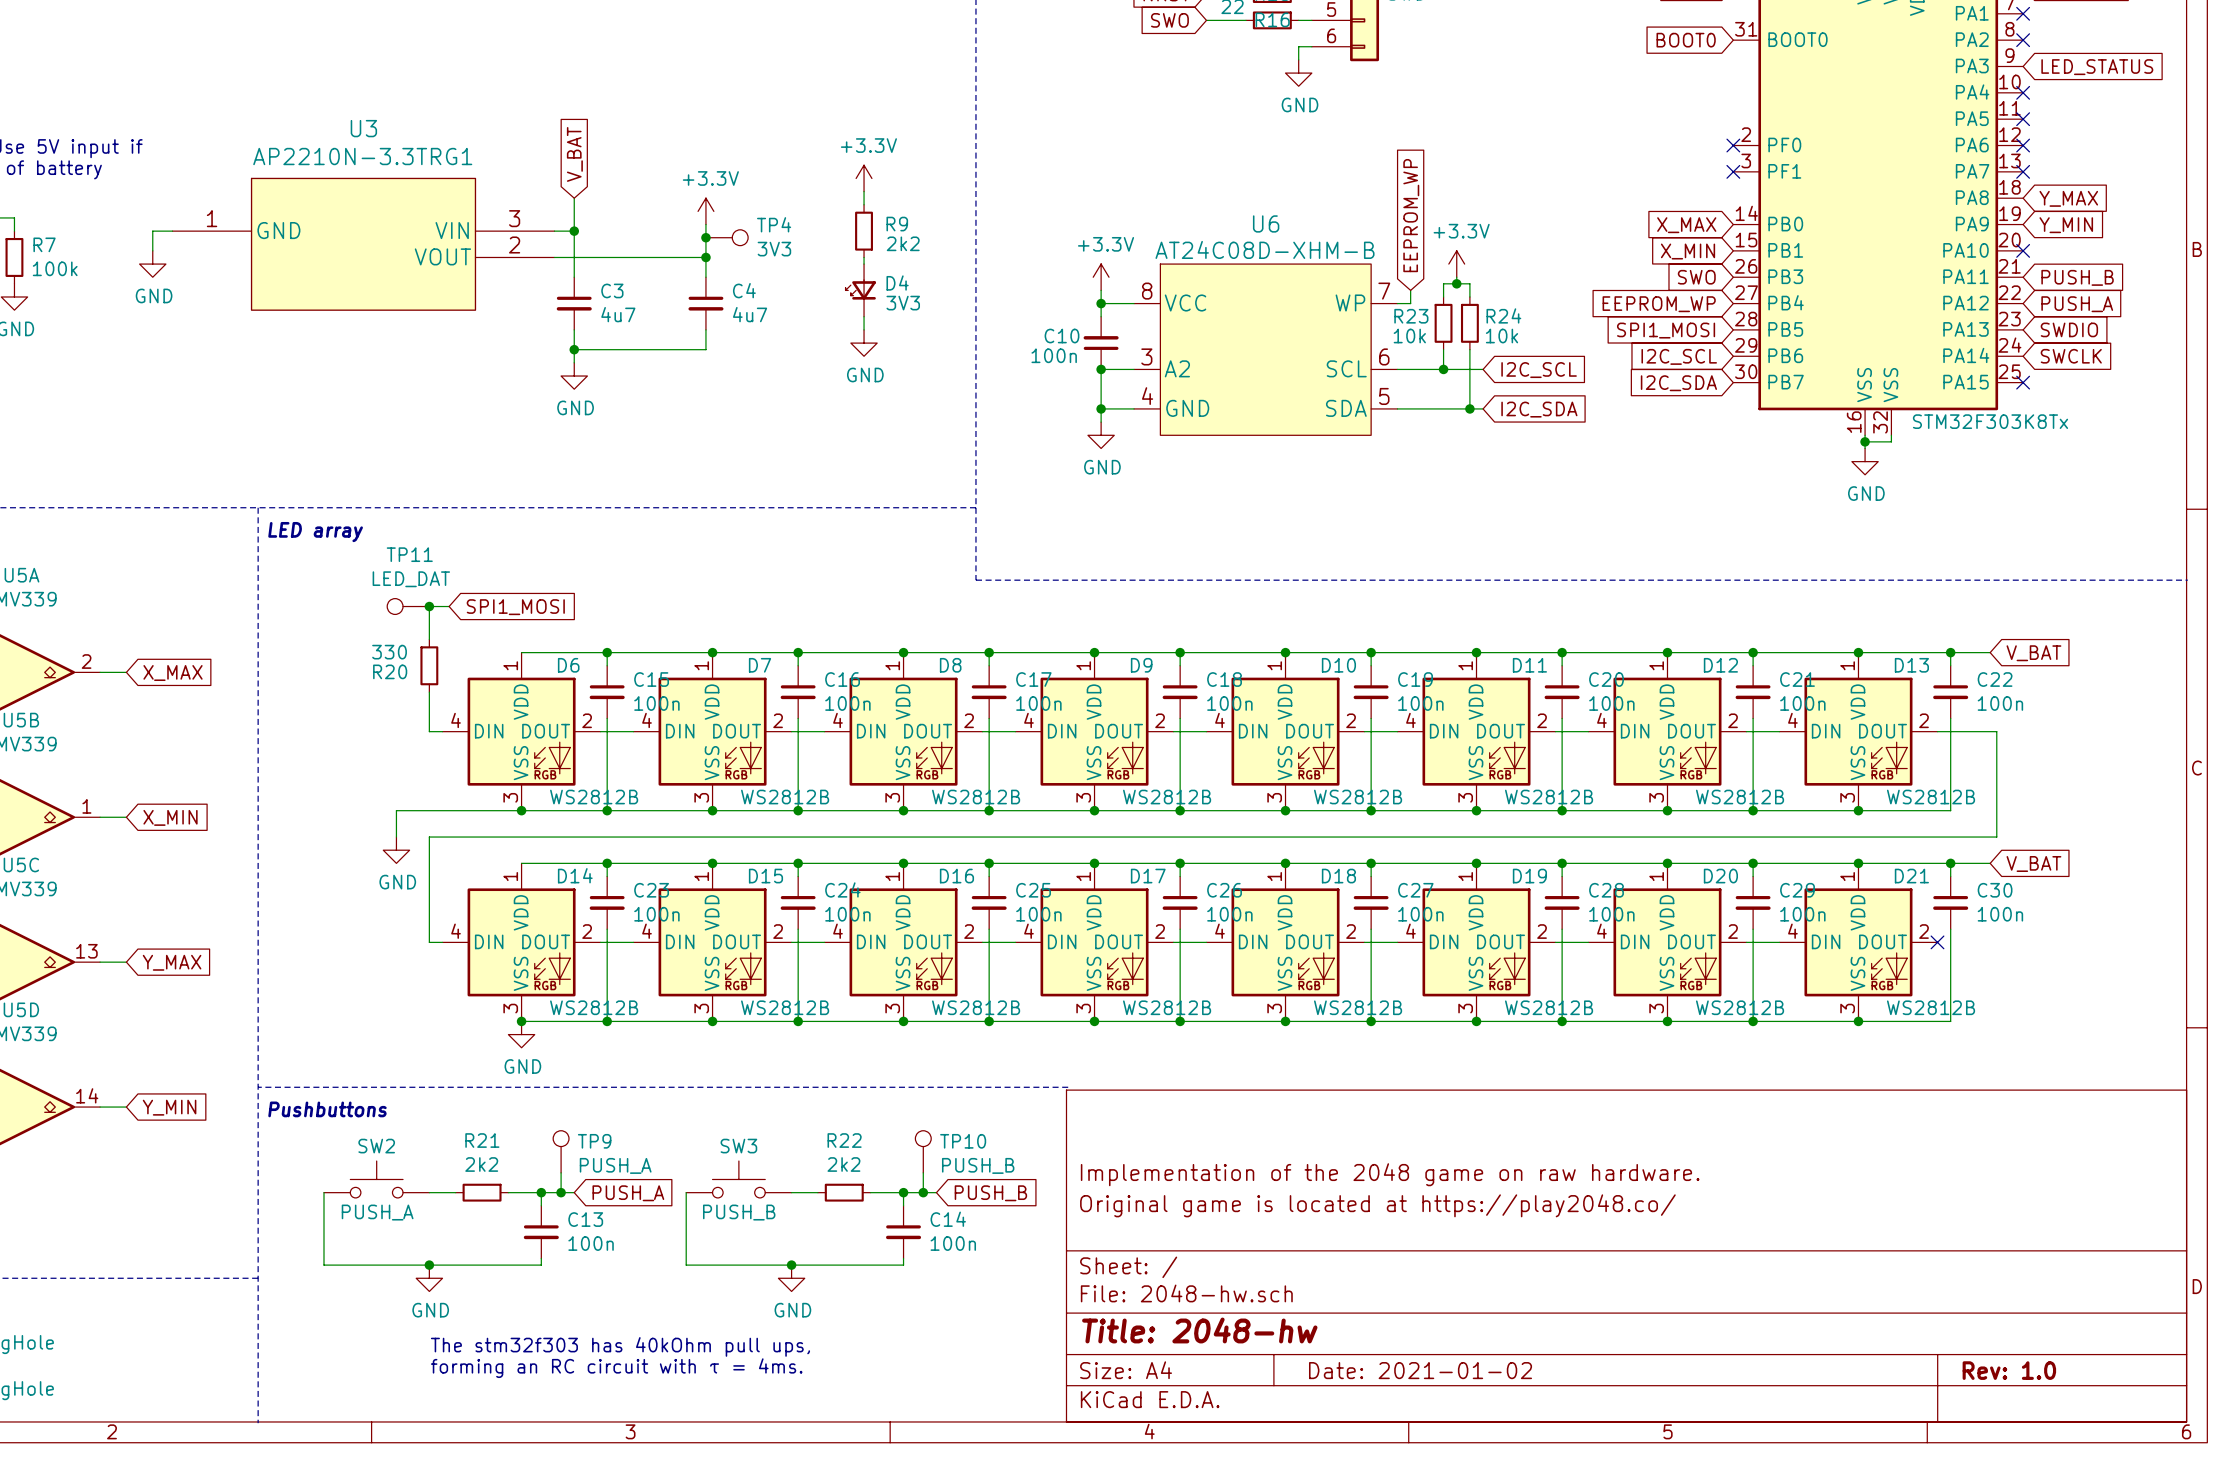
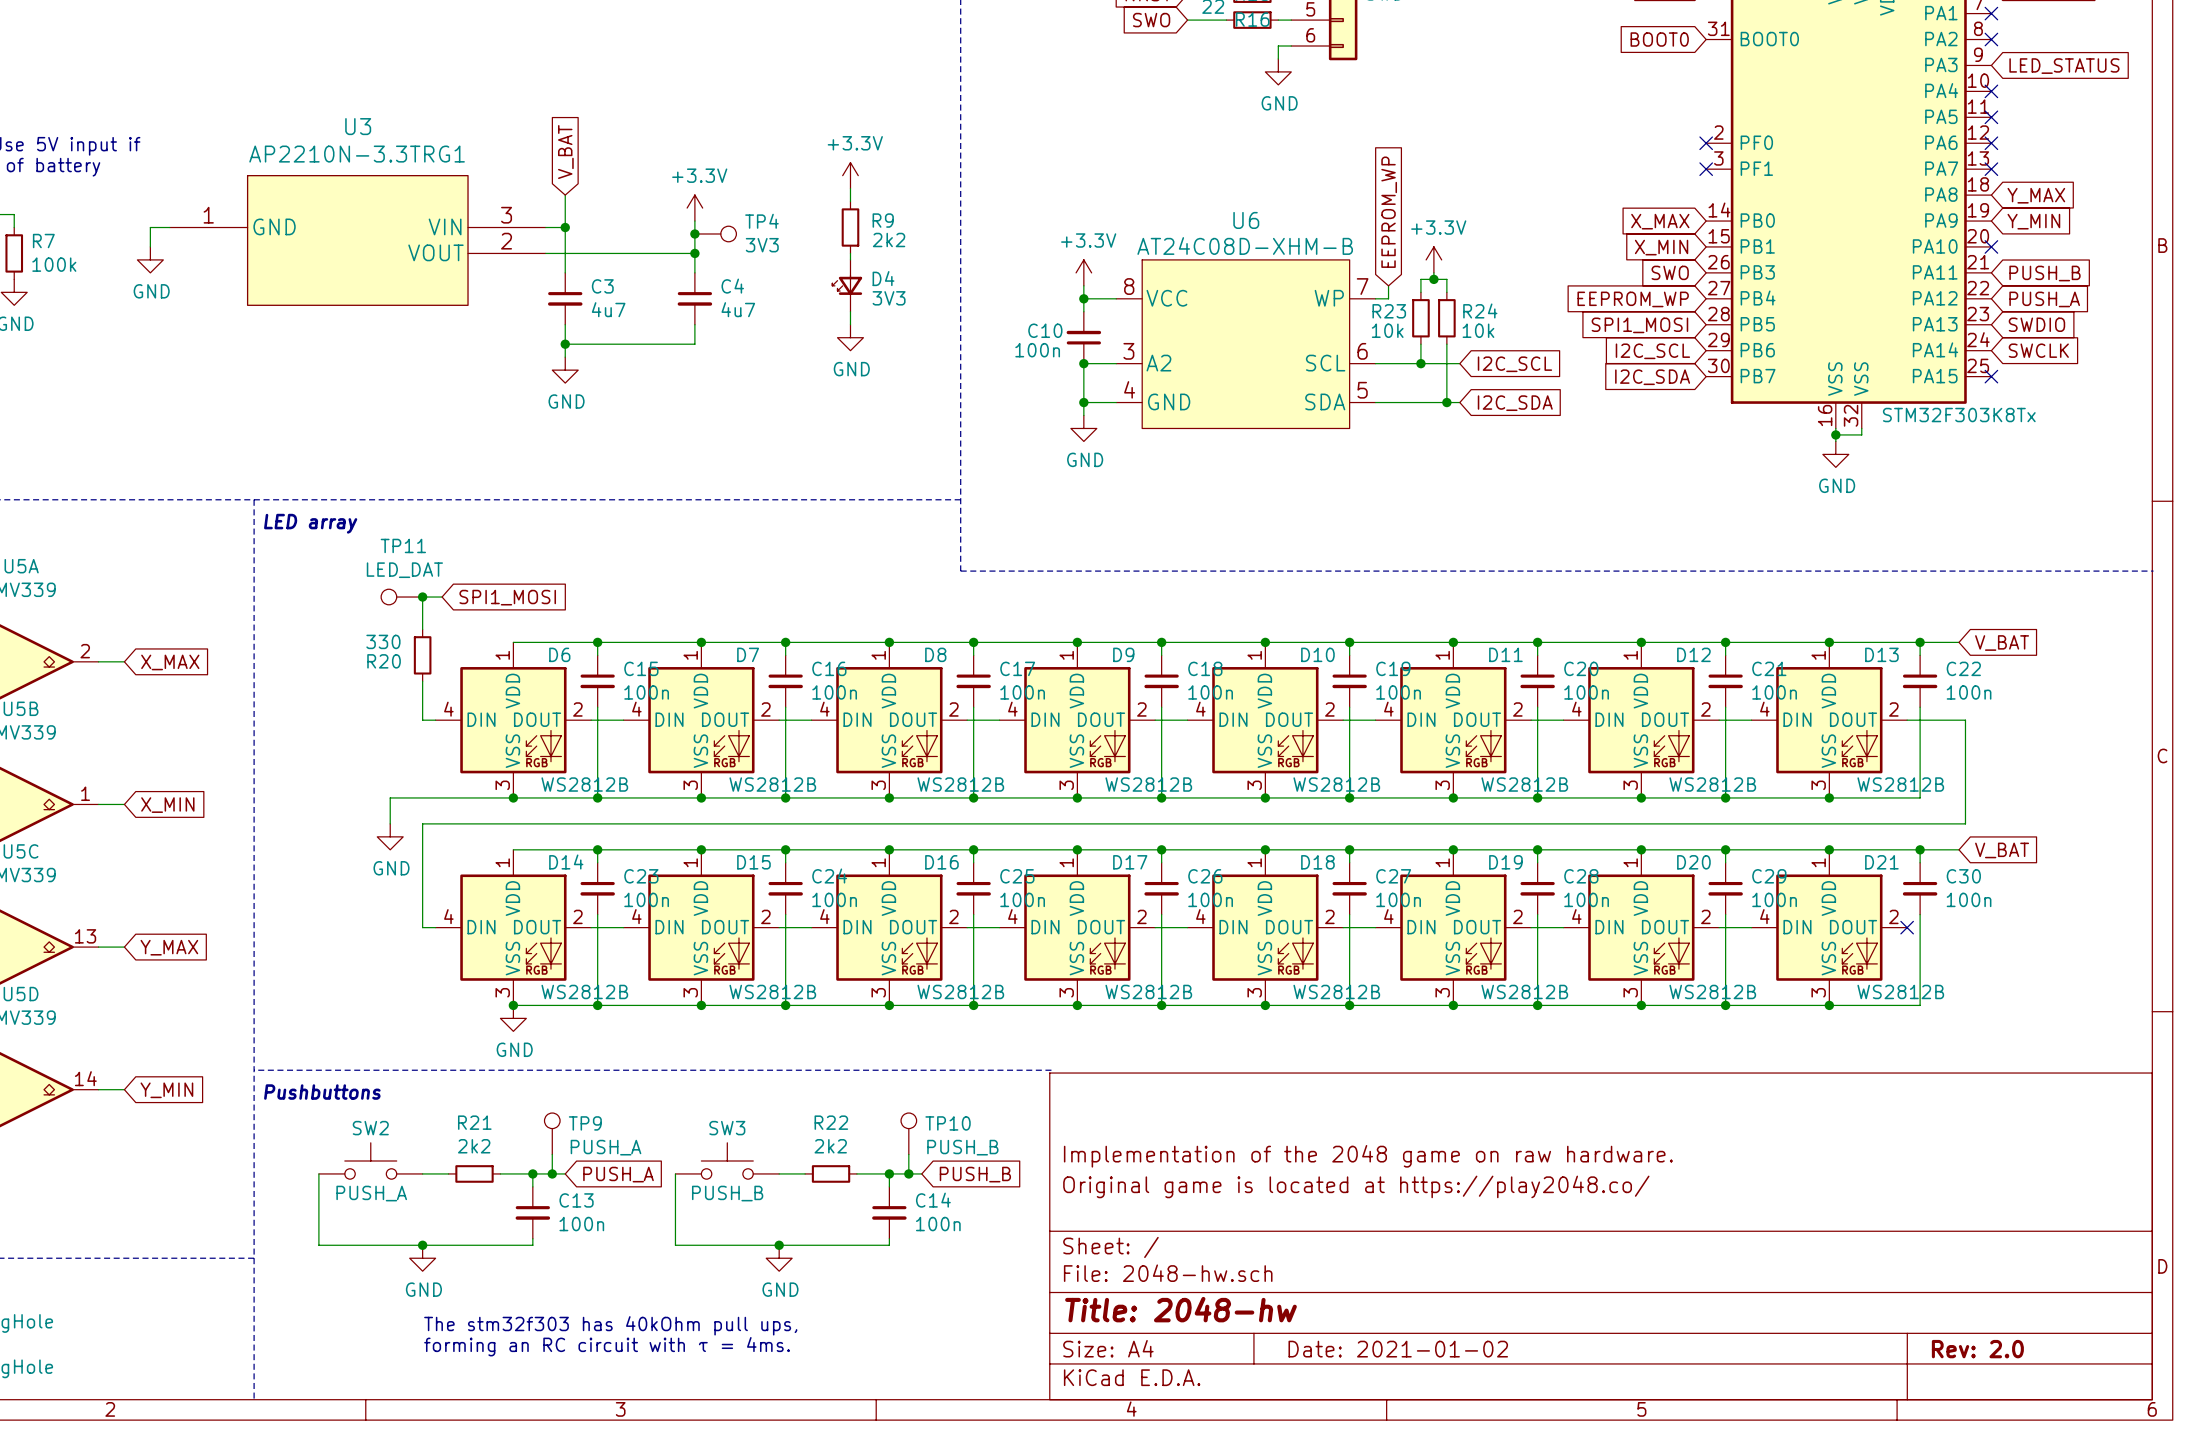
title block: Rev: 1.0 (2009, 1370) -> Rev: 2.0 (1977, 1349)

